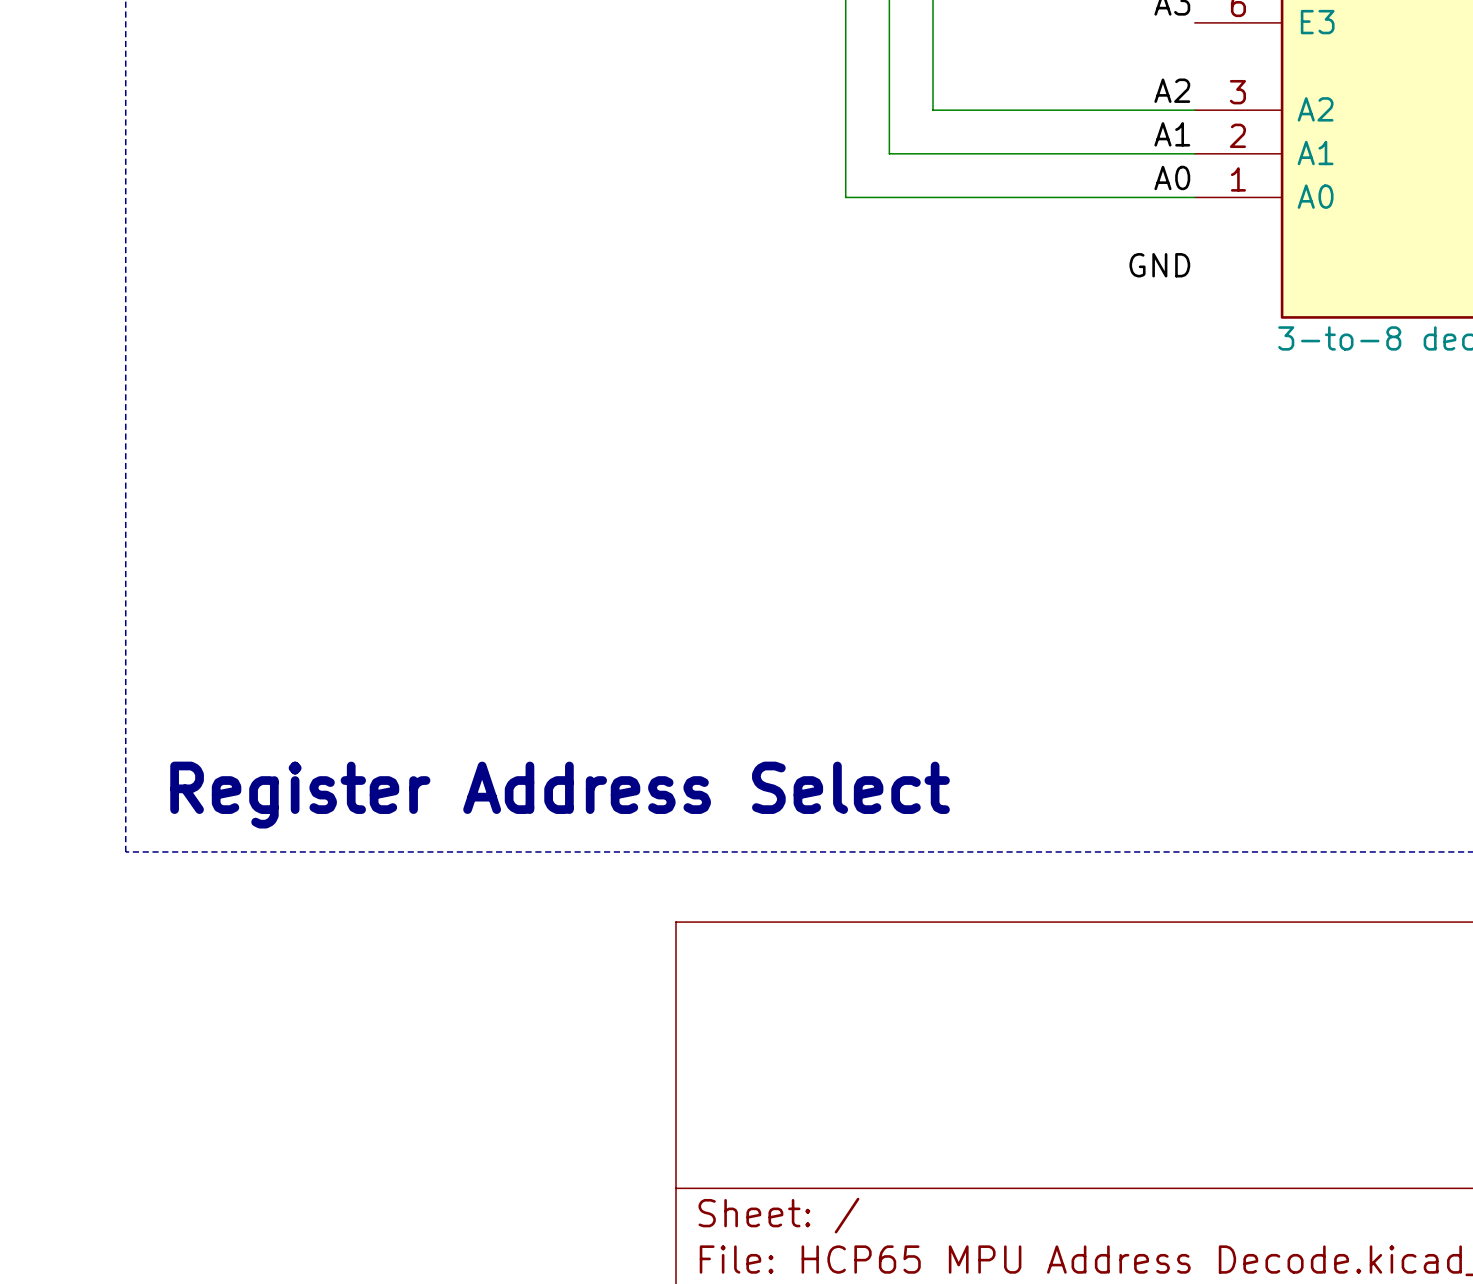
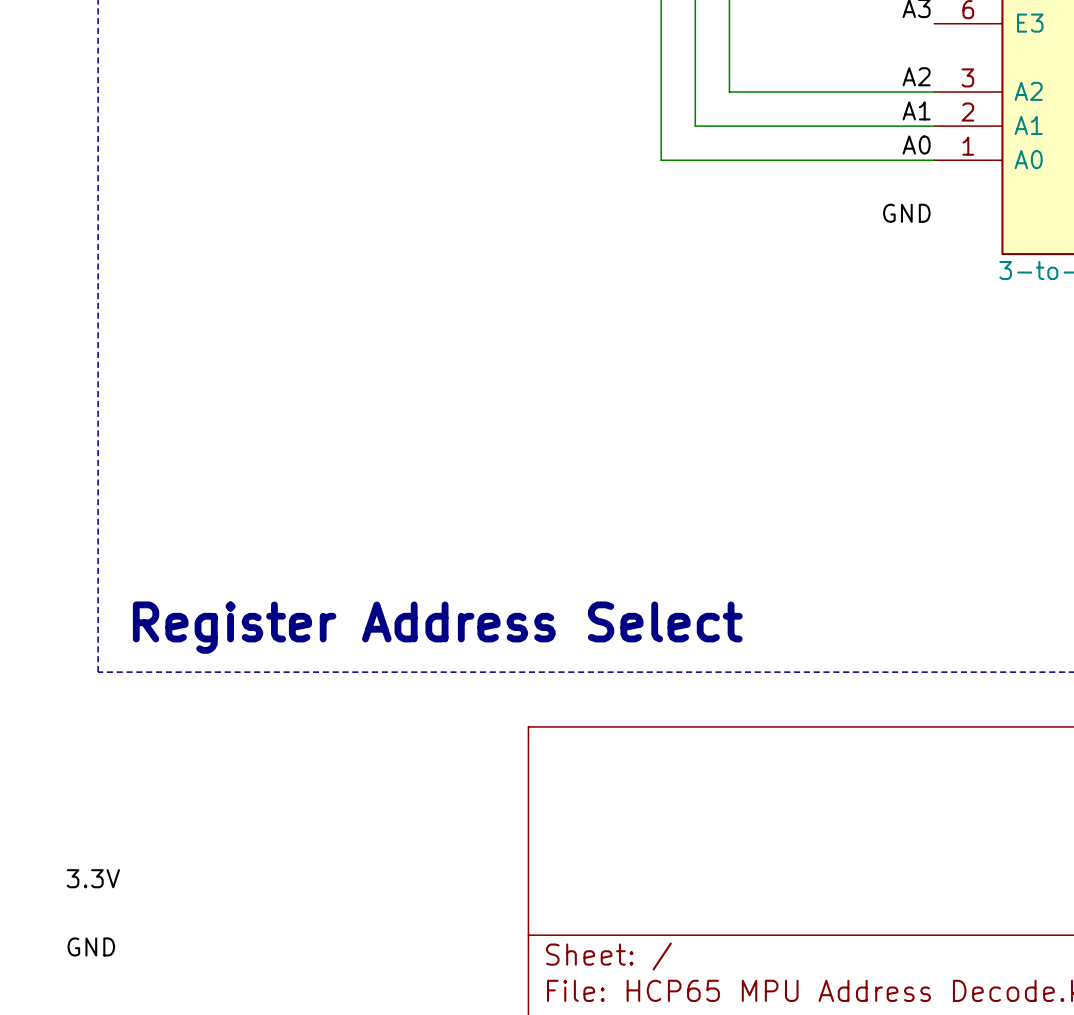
label: none -> 3.3V (93, 878)
label: none -> GND (91, 946)

